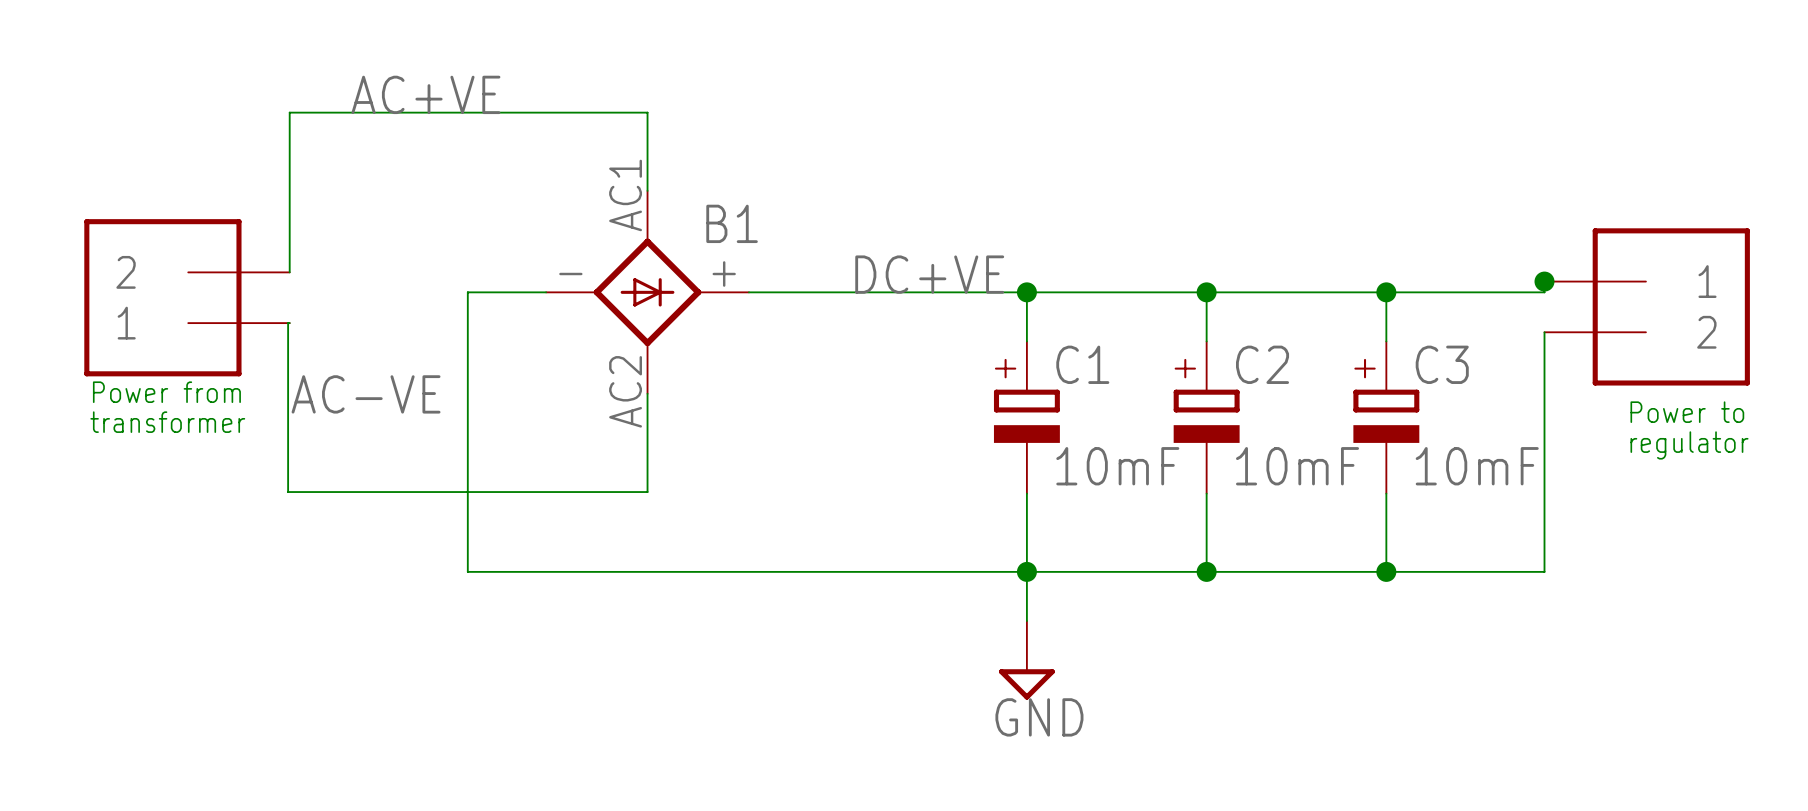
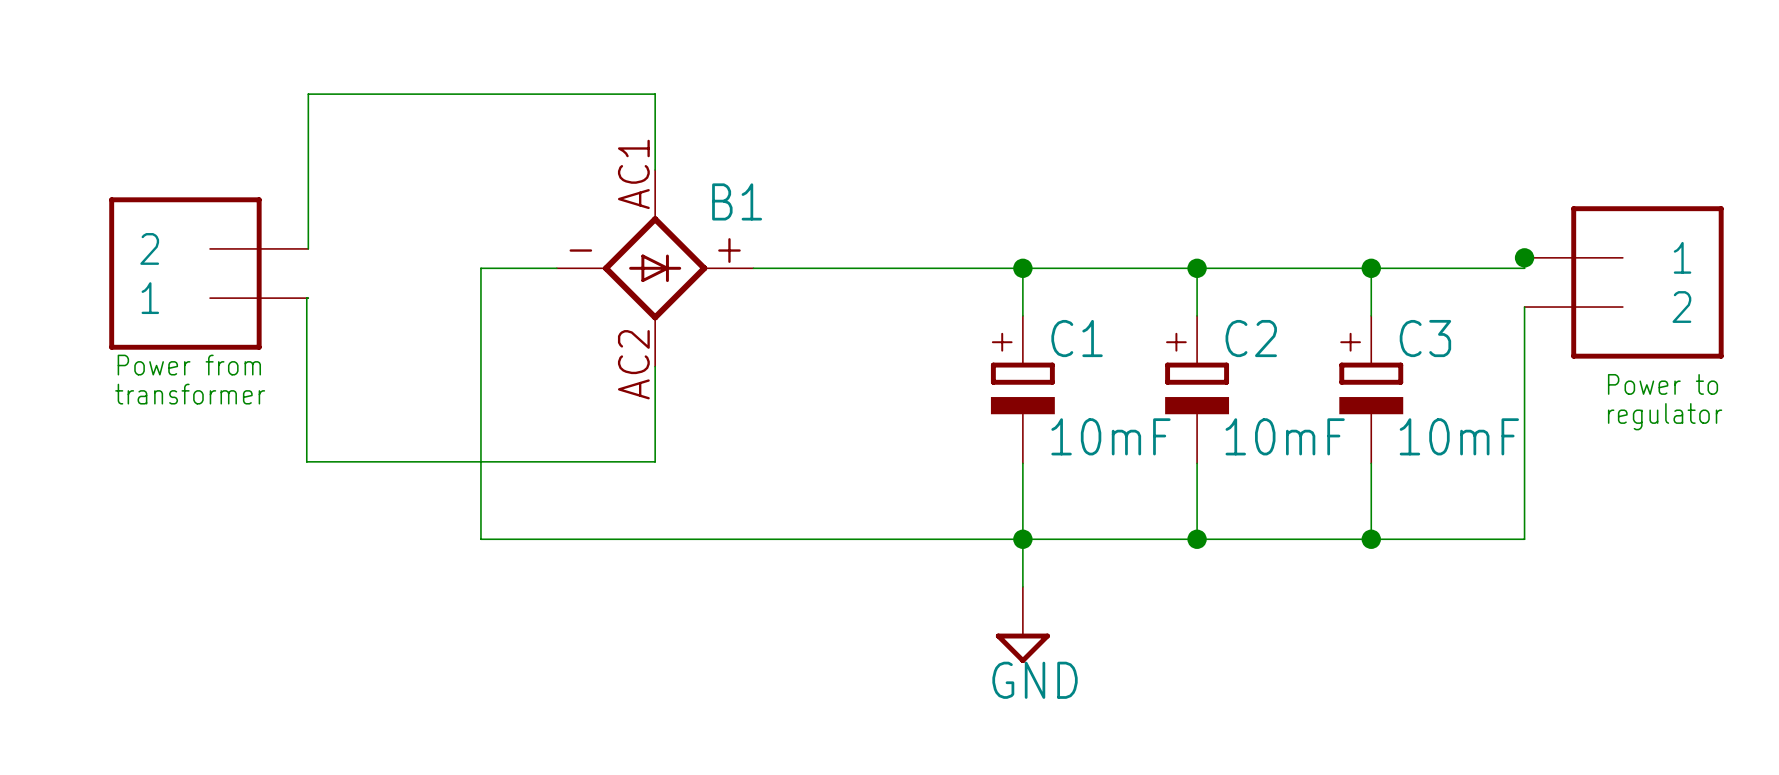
label: AC+VE (425, 94) -> none
label: DC+VE (929, 274) -> none
label: AC-VE (366, 394) -> none

